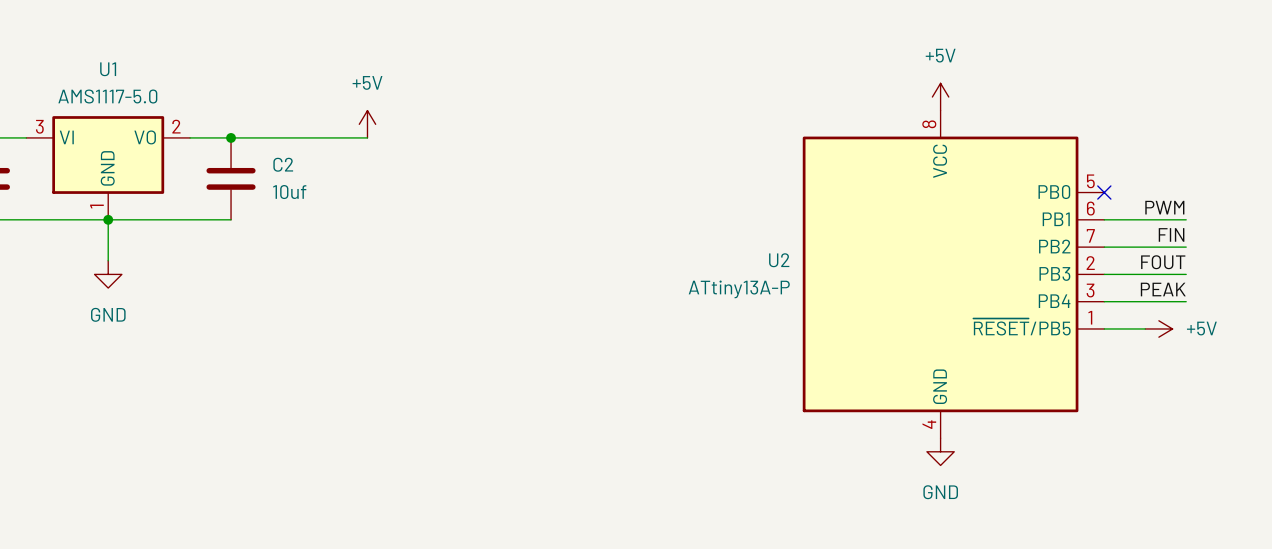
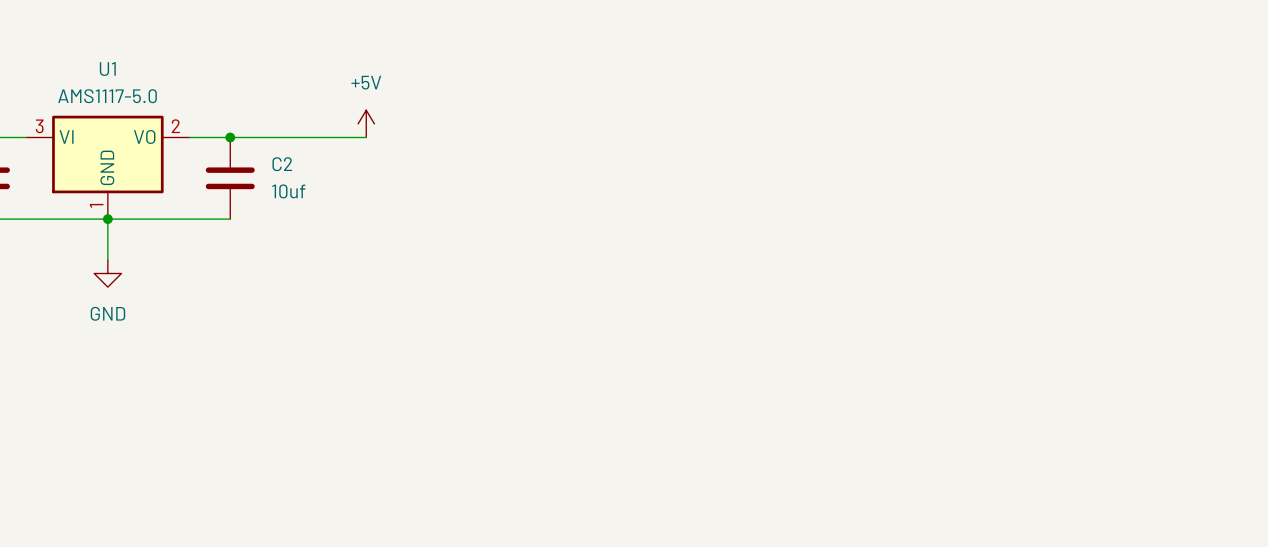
power symbol: +5V (940, 97) -> none
no-connect mark: (1104, 192) -> none
label: PWM (1164, 207) -> none
wire: (1104, 219) (1186, 219) -> none
label: FIN (1171, 234) -> none
wire: (1104, 247) (1186, 247) -> none
label: FOUT (1163, 262) -> none
U2: ATtiny13A-P (953, 274) -> none
wire: (1104, 274) (1186, 274) -> none
label: PEAK (1163, 289) -> none
wire: (1104, 301) (1186, 301) -> none
wire: (1104, 328) (1145, 328) -> none
power symbol: +5V (1158, 328) -> none
power symbol: GND (940, 451) -> none

